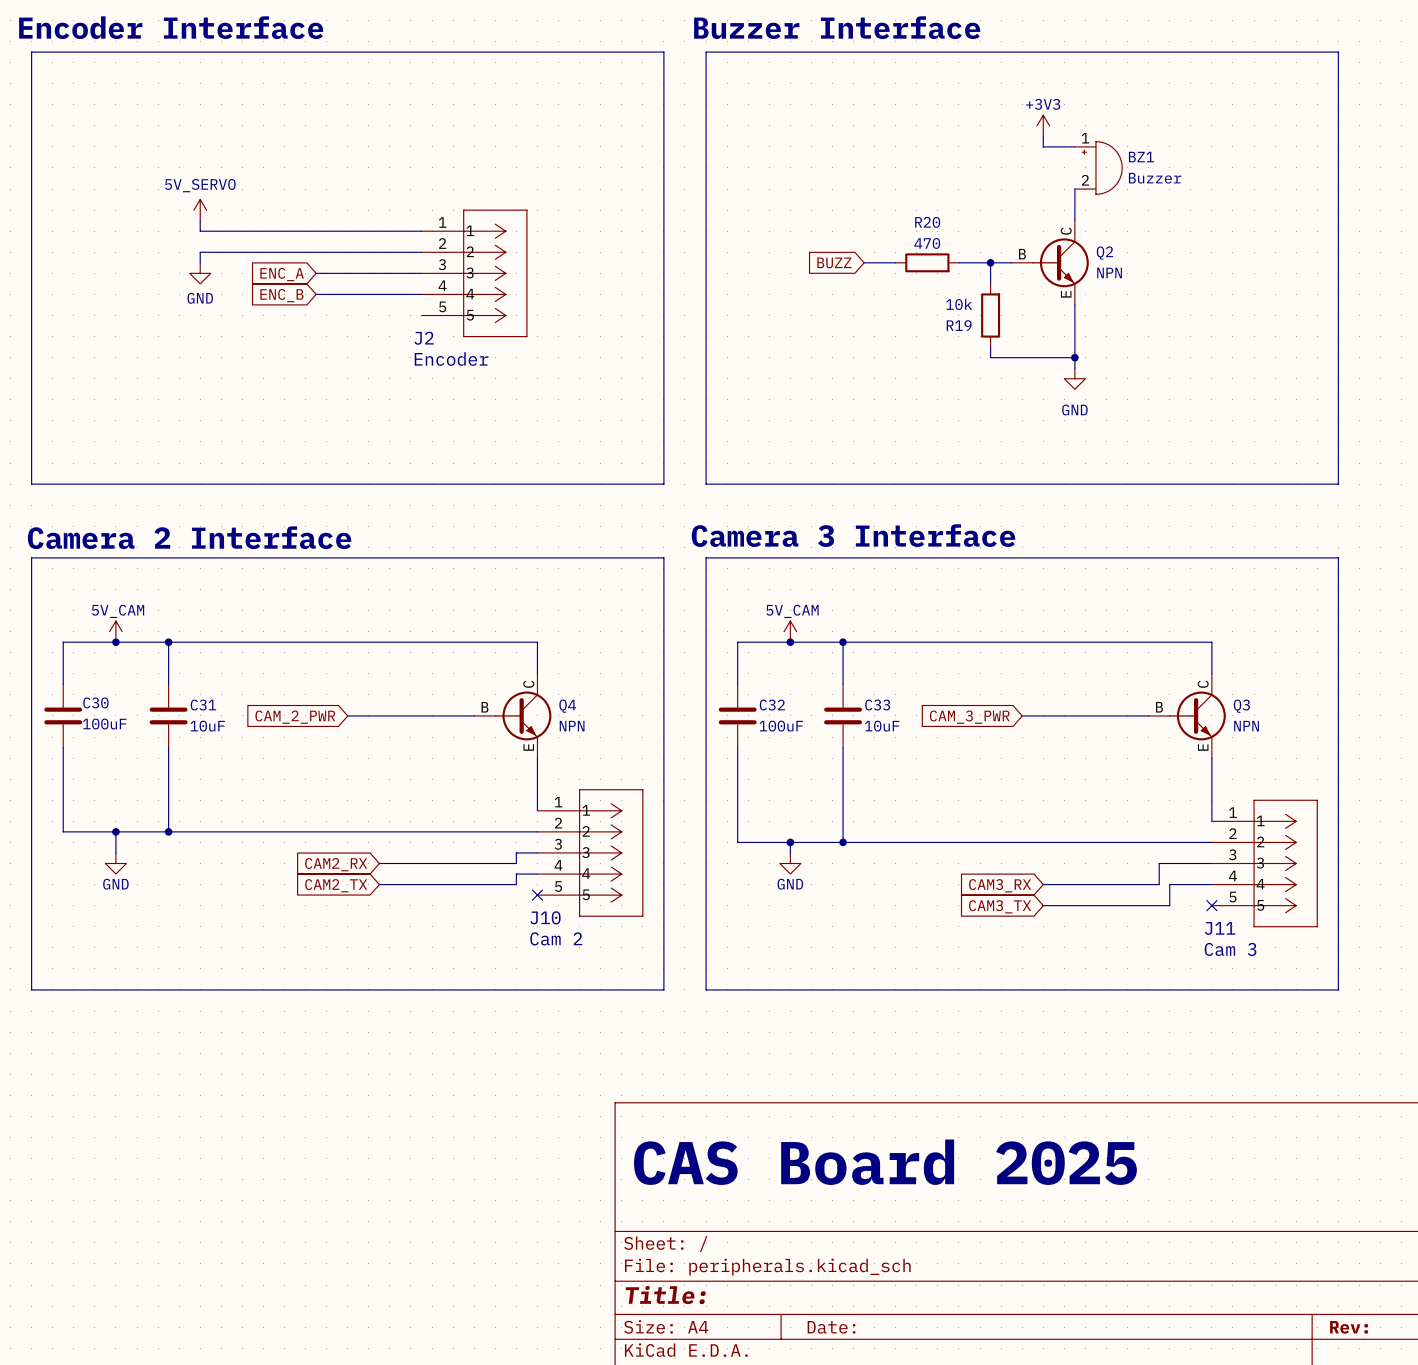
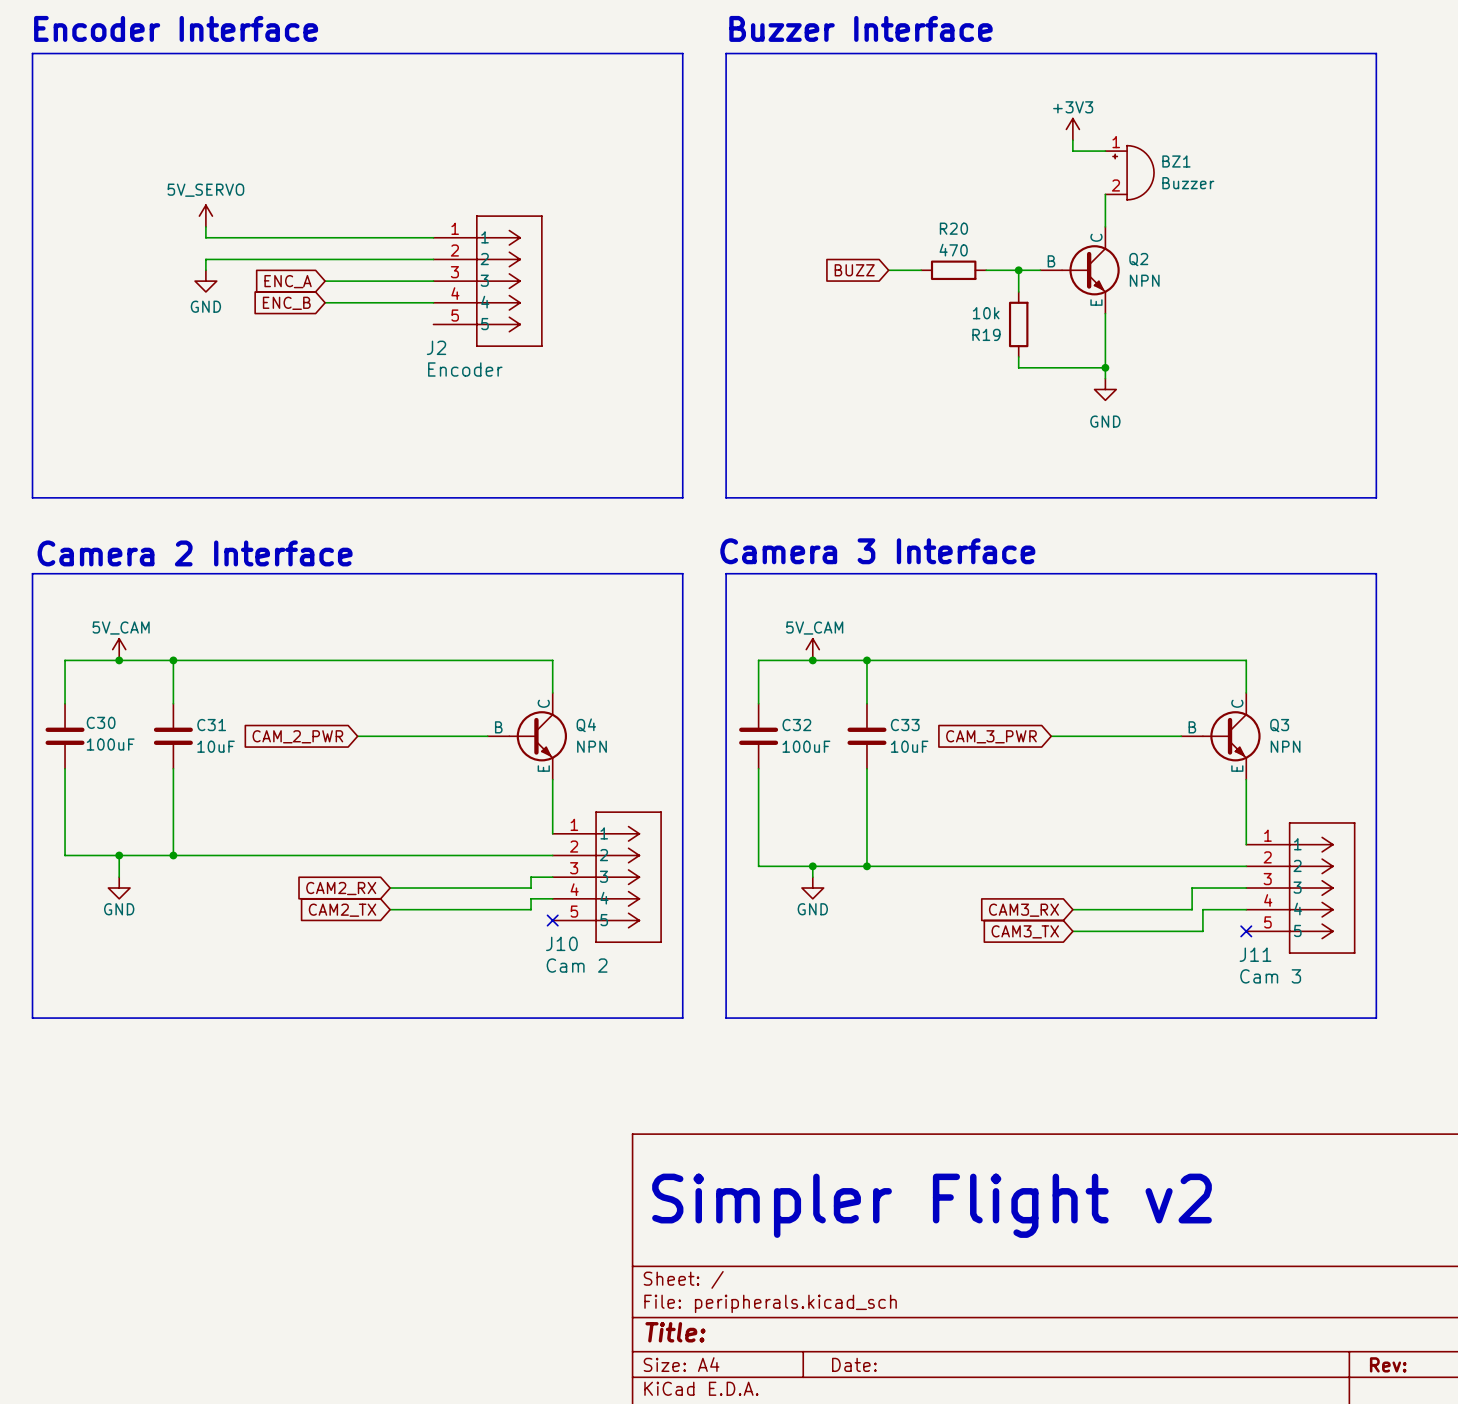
text: CAS Board 2025 (885, 1162) -> none
text: none -> Simpler Flight v2 (932, 1205)

